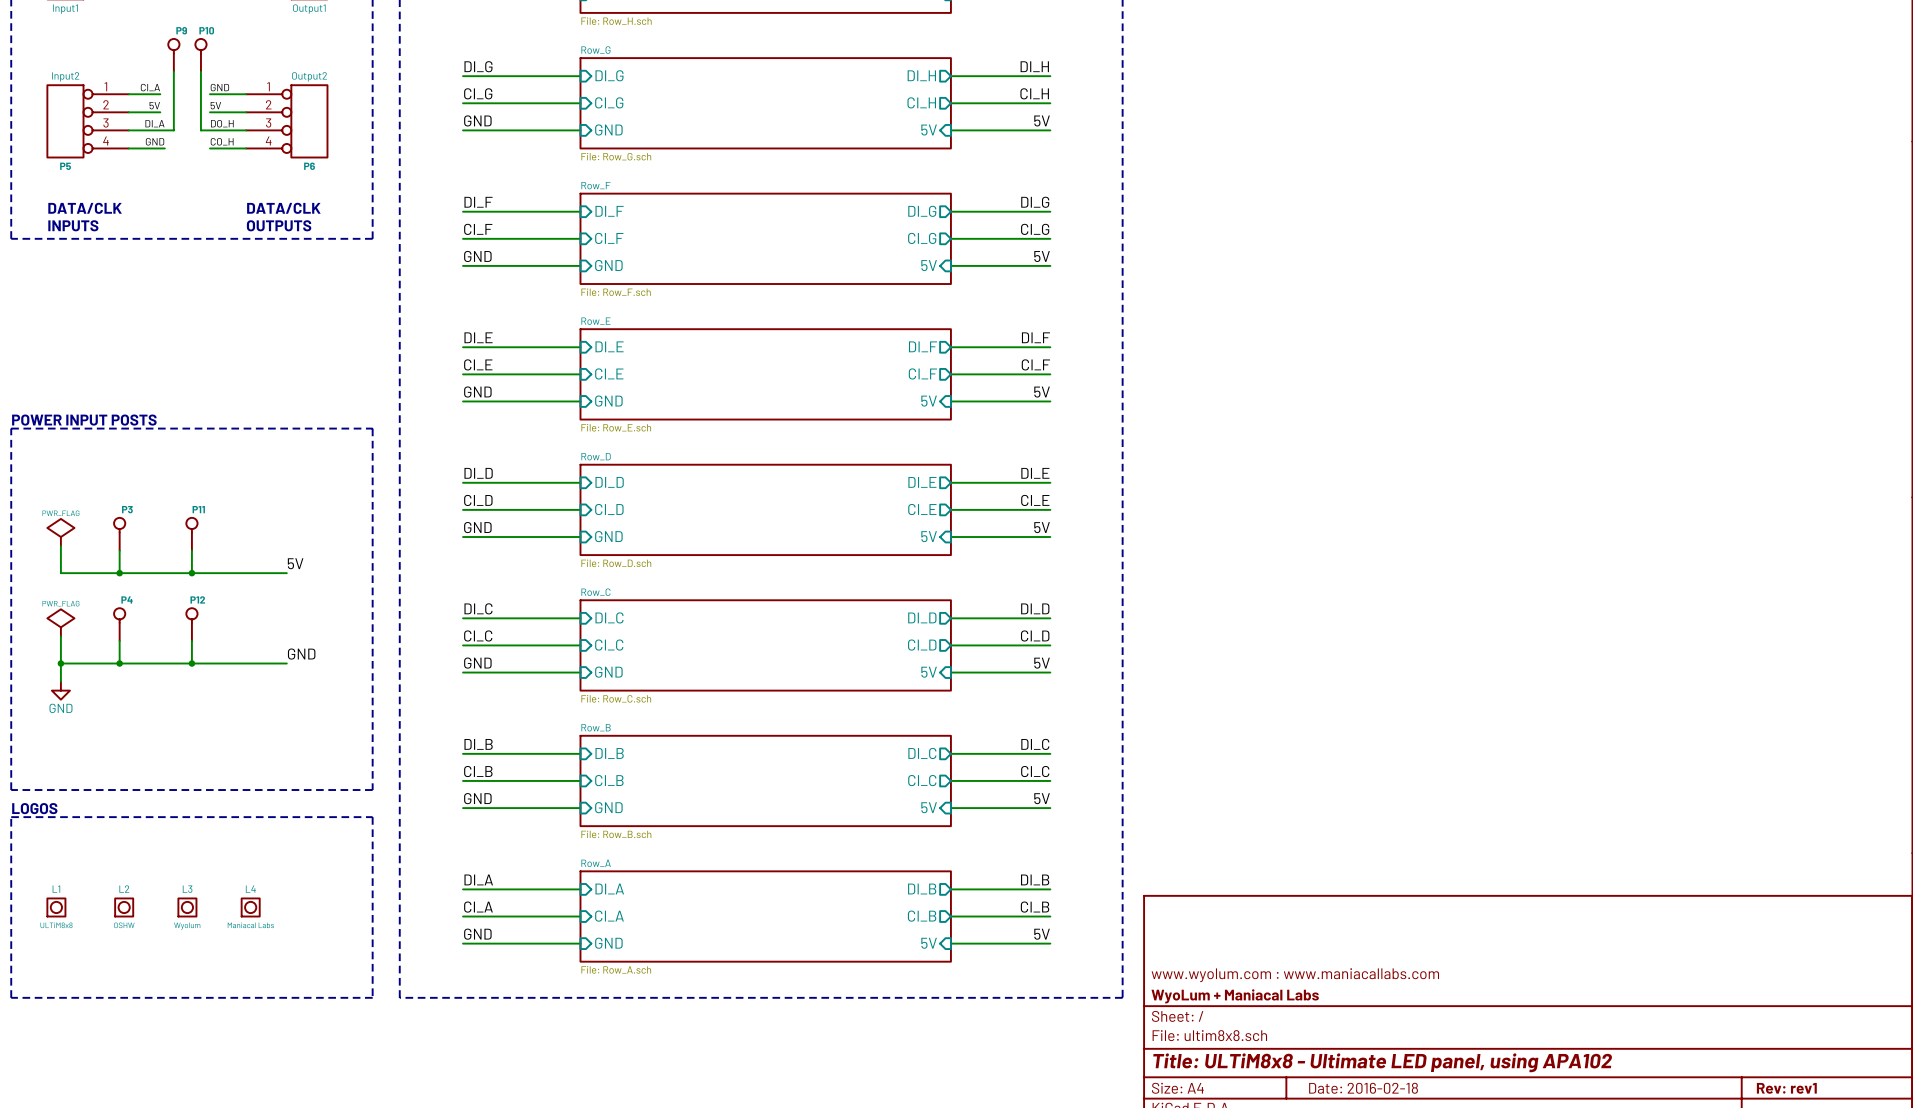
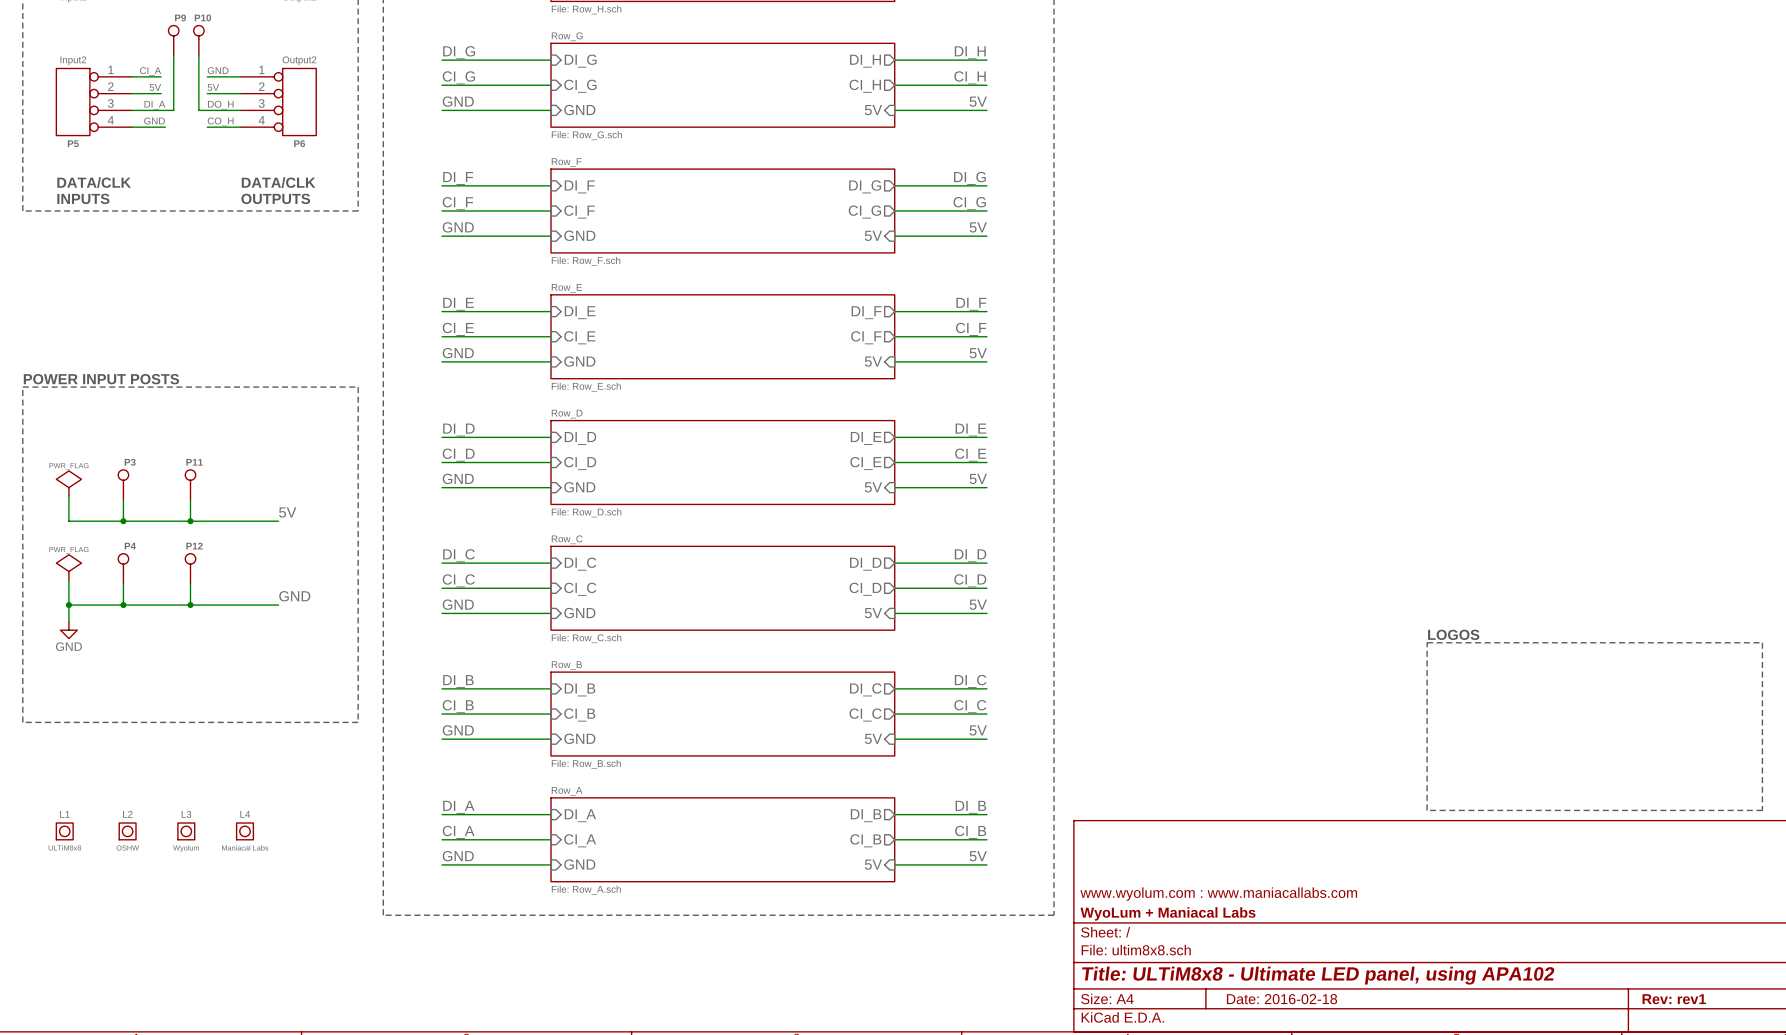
text: none -> LOGOS (1453, 634)
line: none -> (1427, 642) (1762, 642) (1762, 810) (1427, 810) (1427, 642)
text: LOGOS (34, 808) -> none
line: (11, 817) (11, 997) (372, 997) (372, 817) (11, 817) -> none

